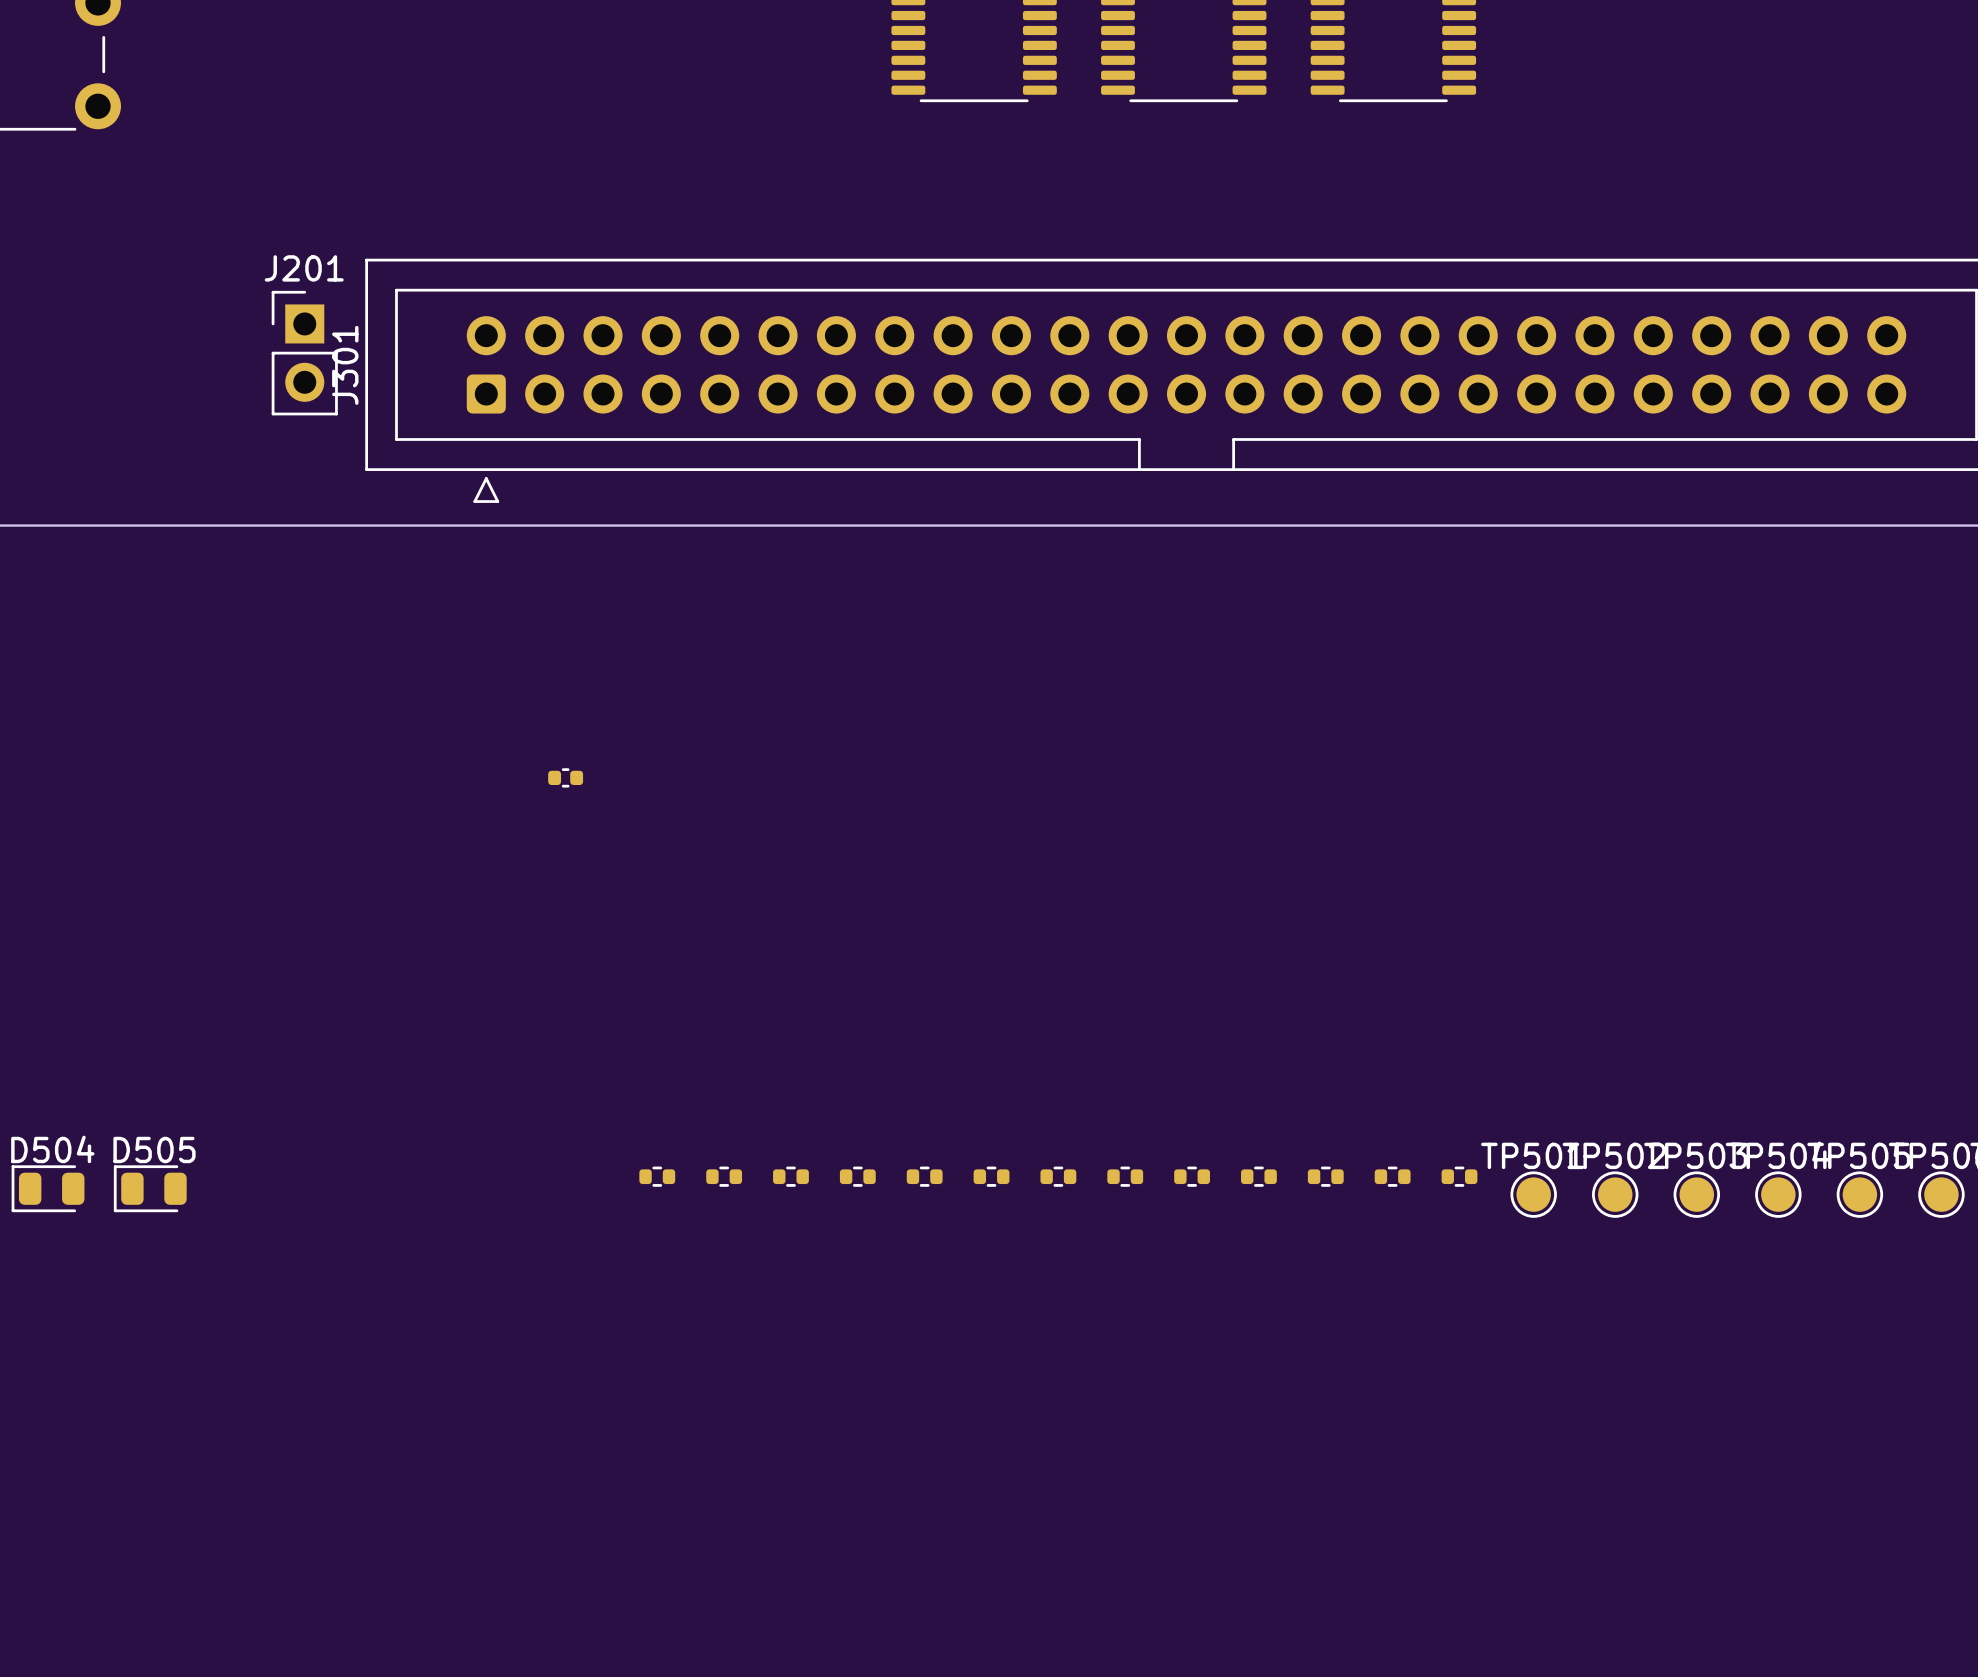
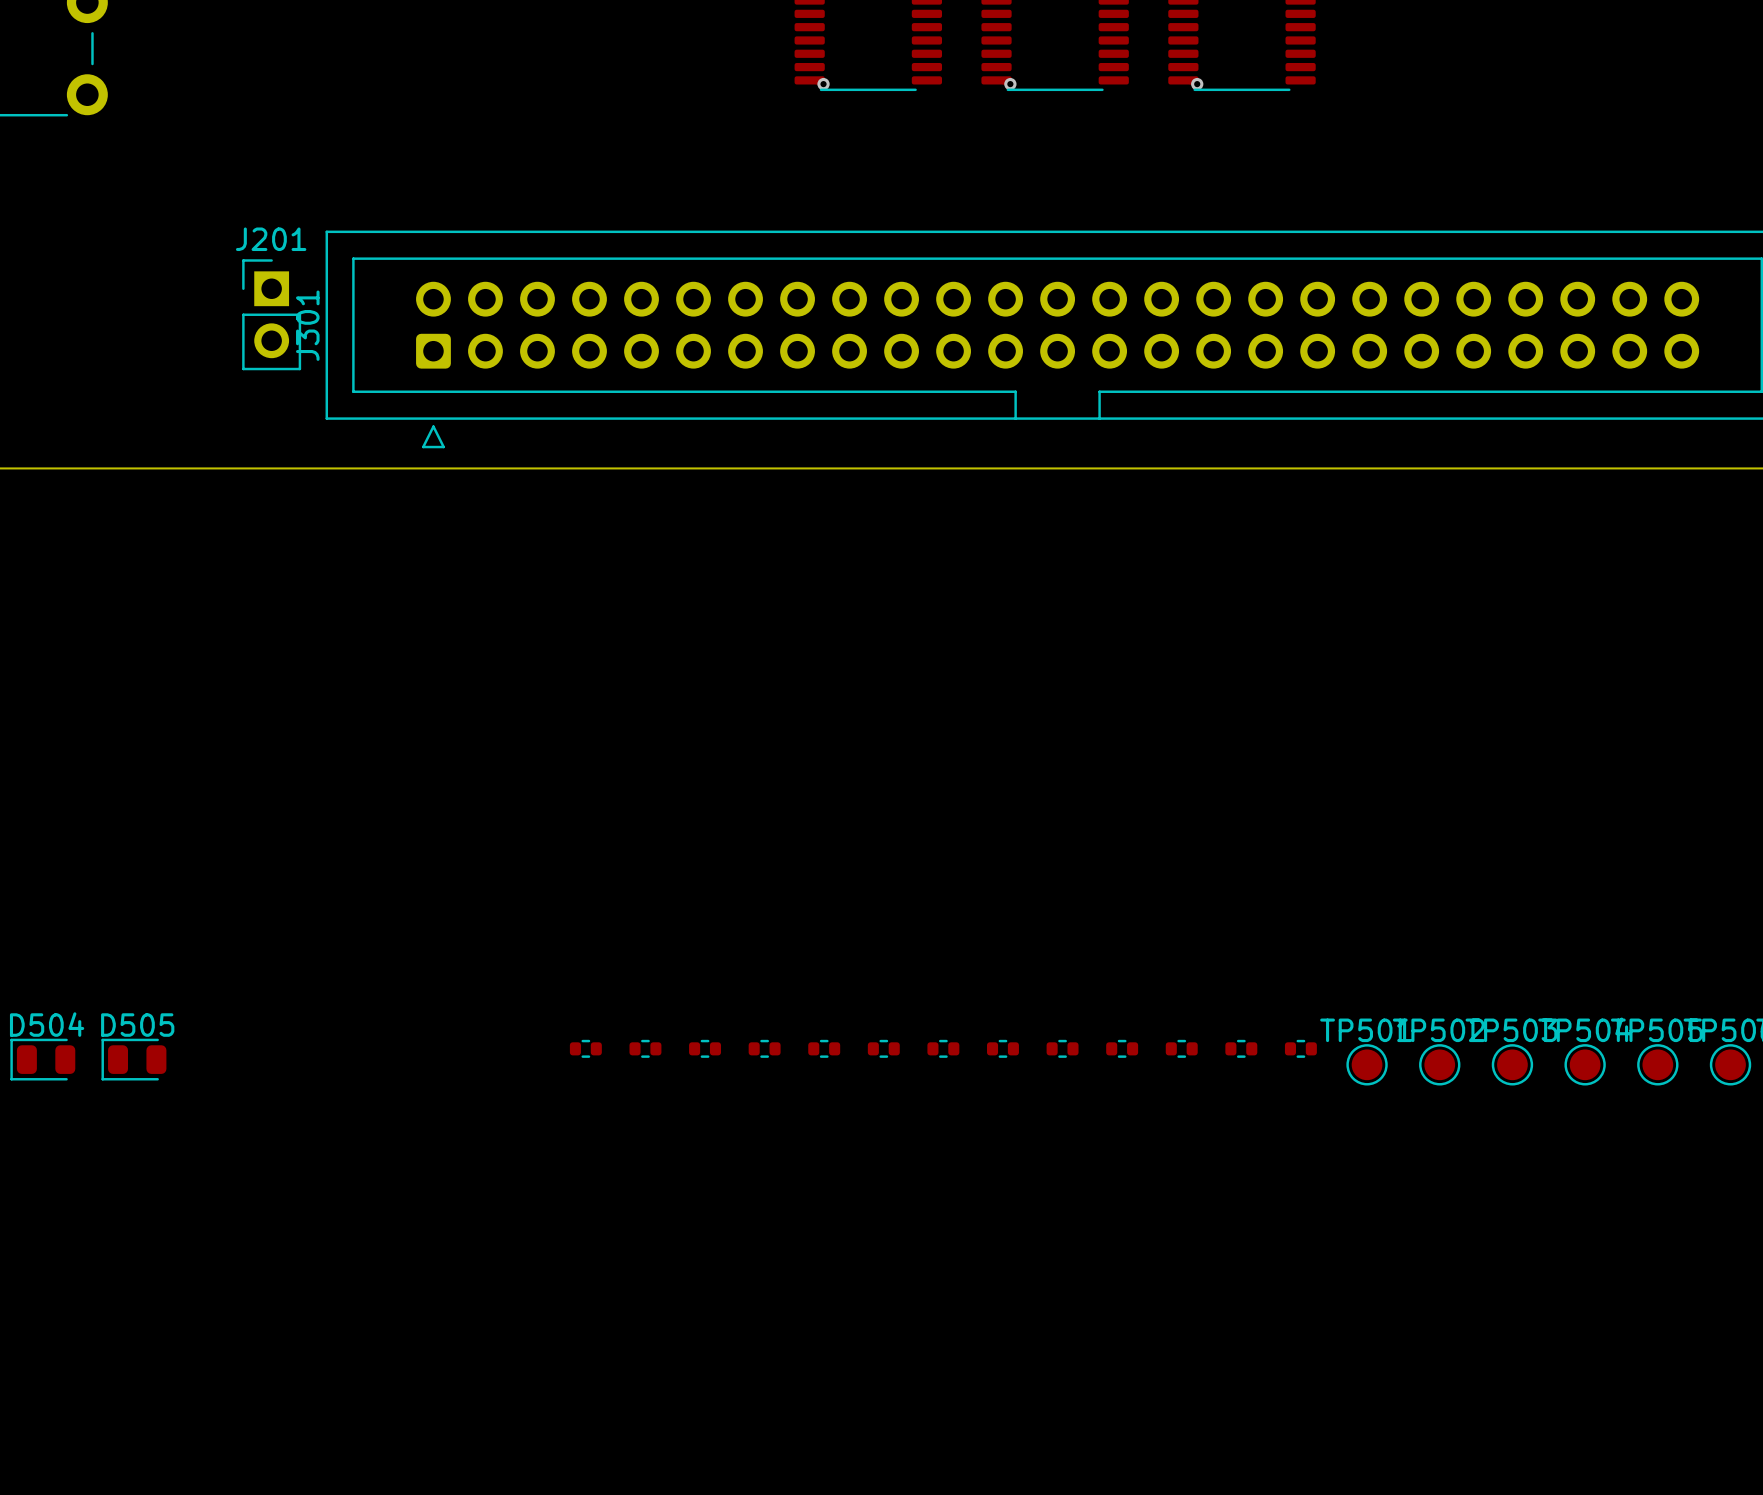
via: none -> (823, 84)
via: none -> (1010, 84)
via: none -> (1197, 84)
part: (565, 777) -> none

